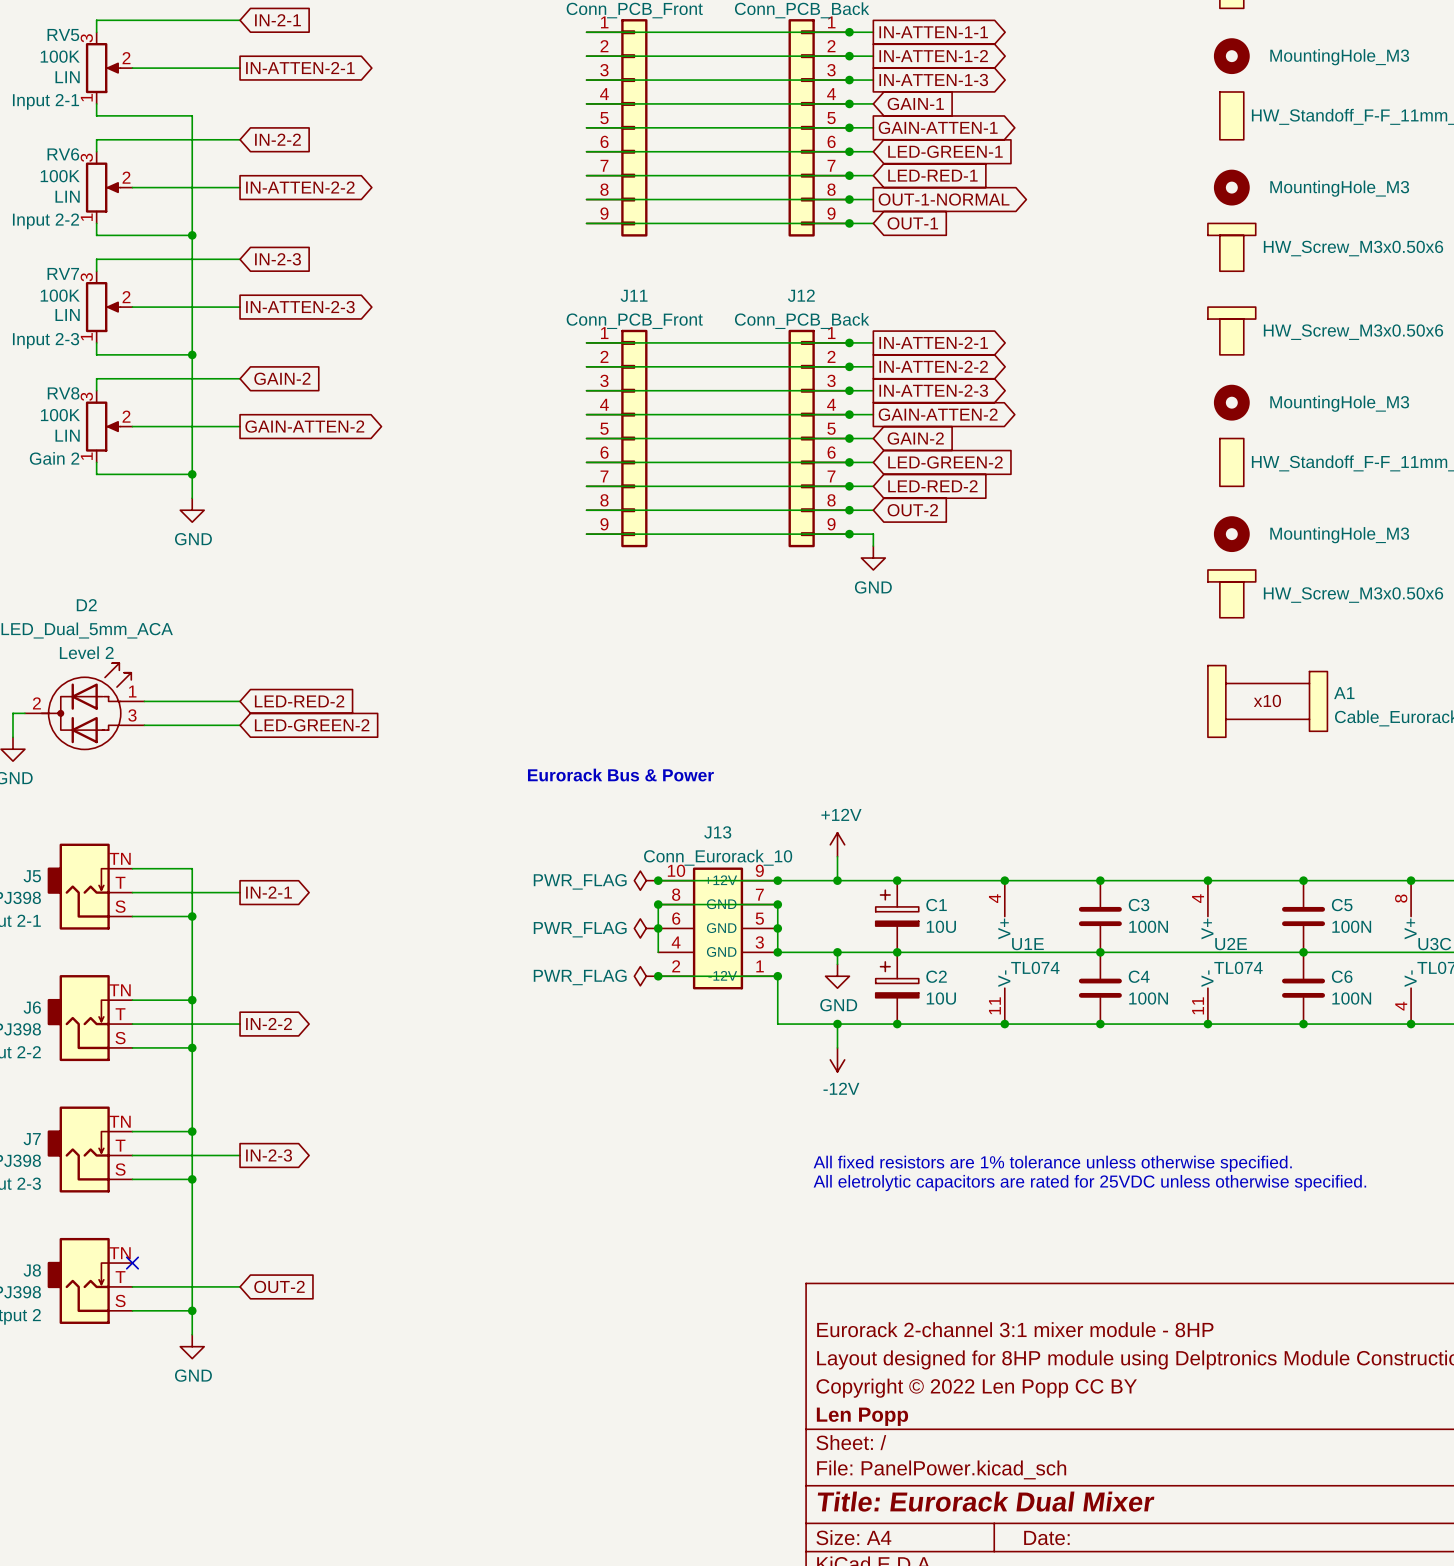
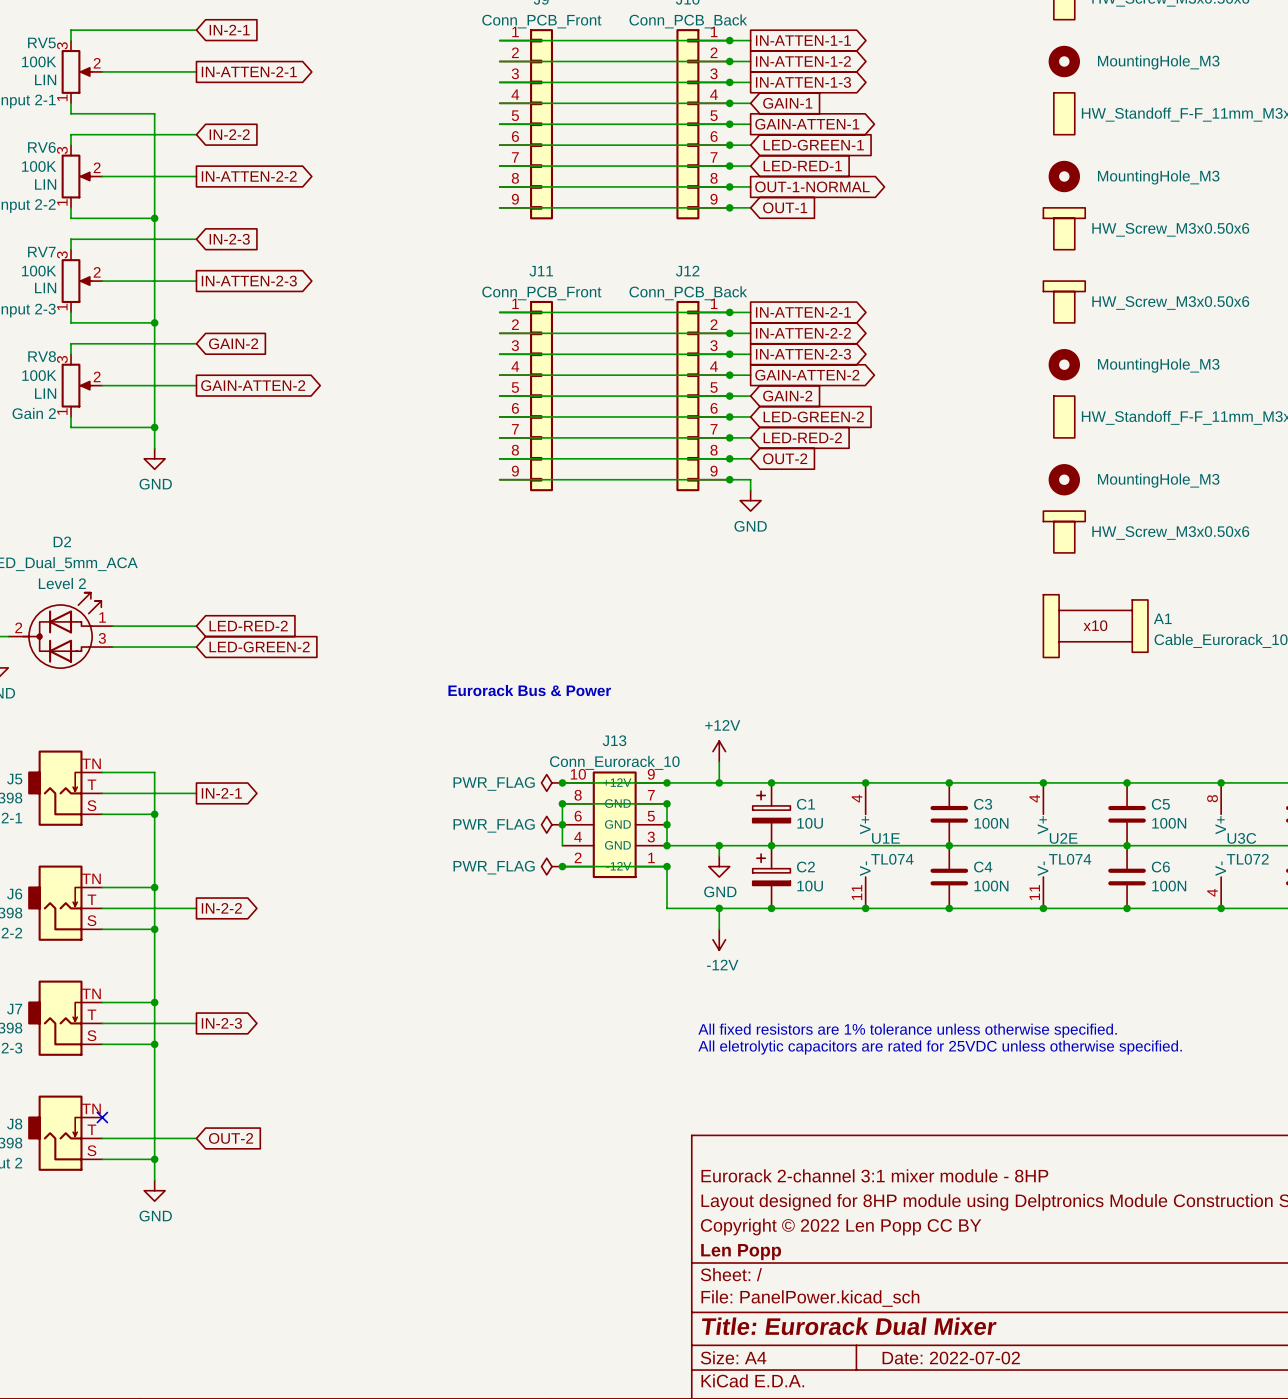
title block: Date: (1046, 1538) -> Date: 2022-07-02 (951, 1358)

